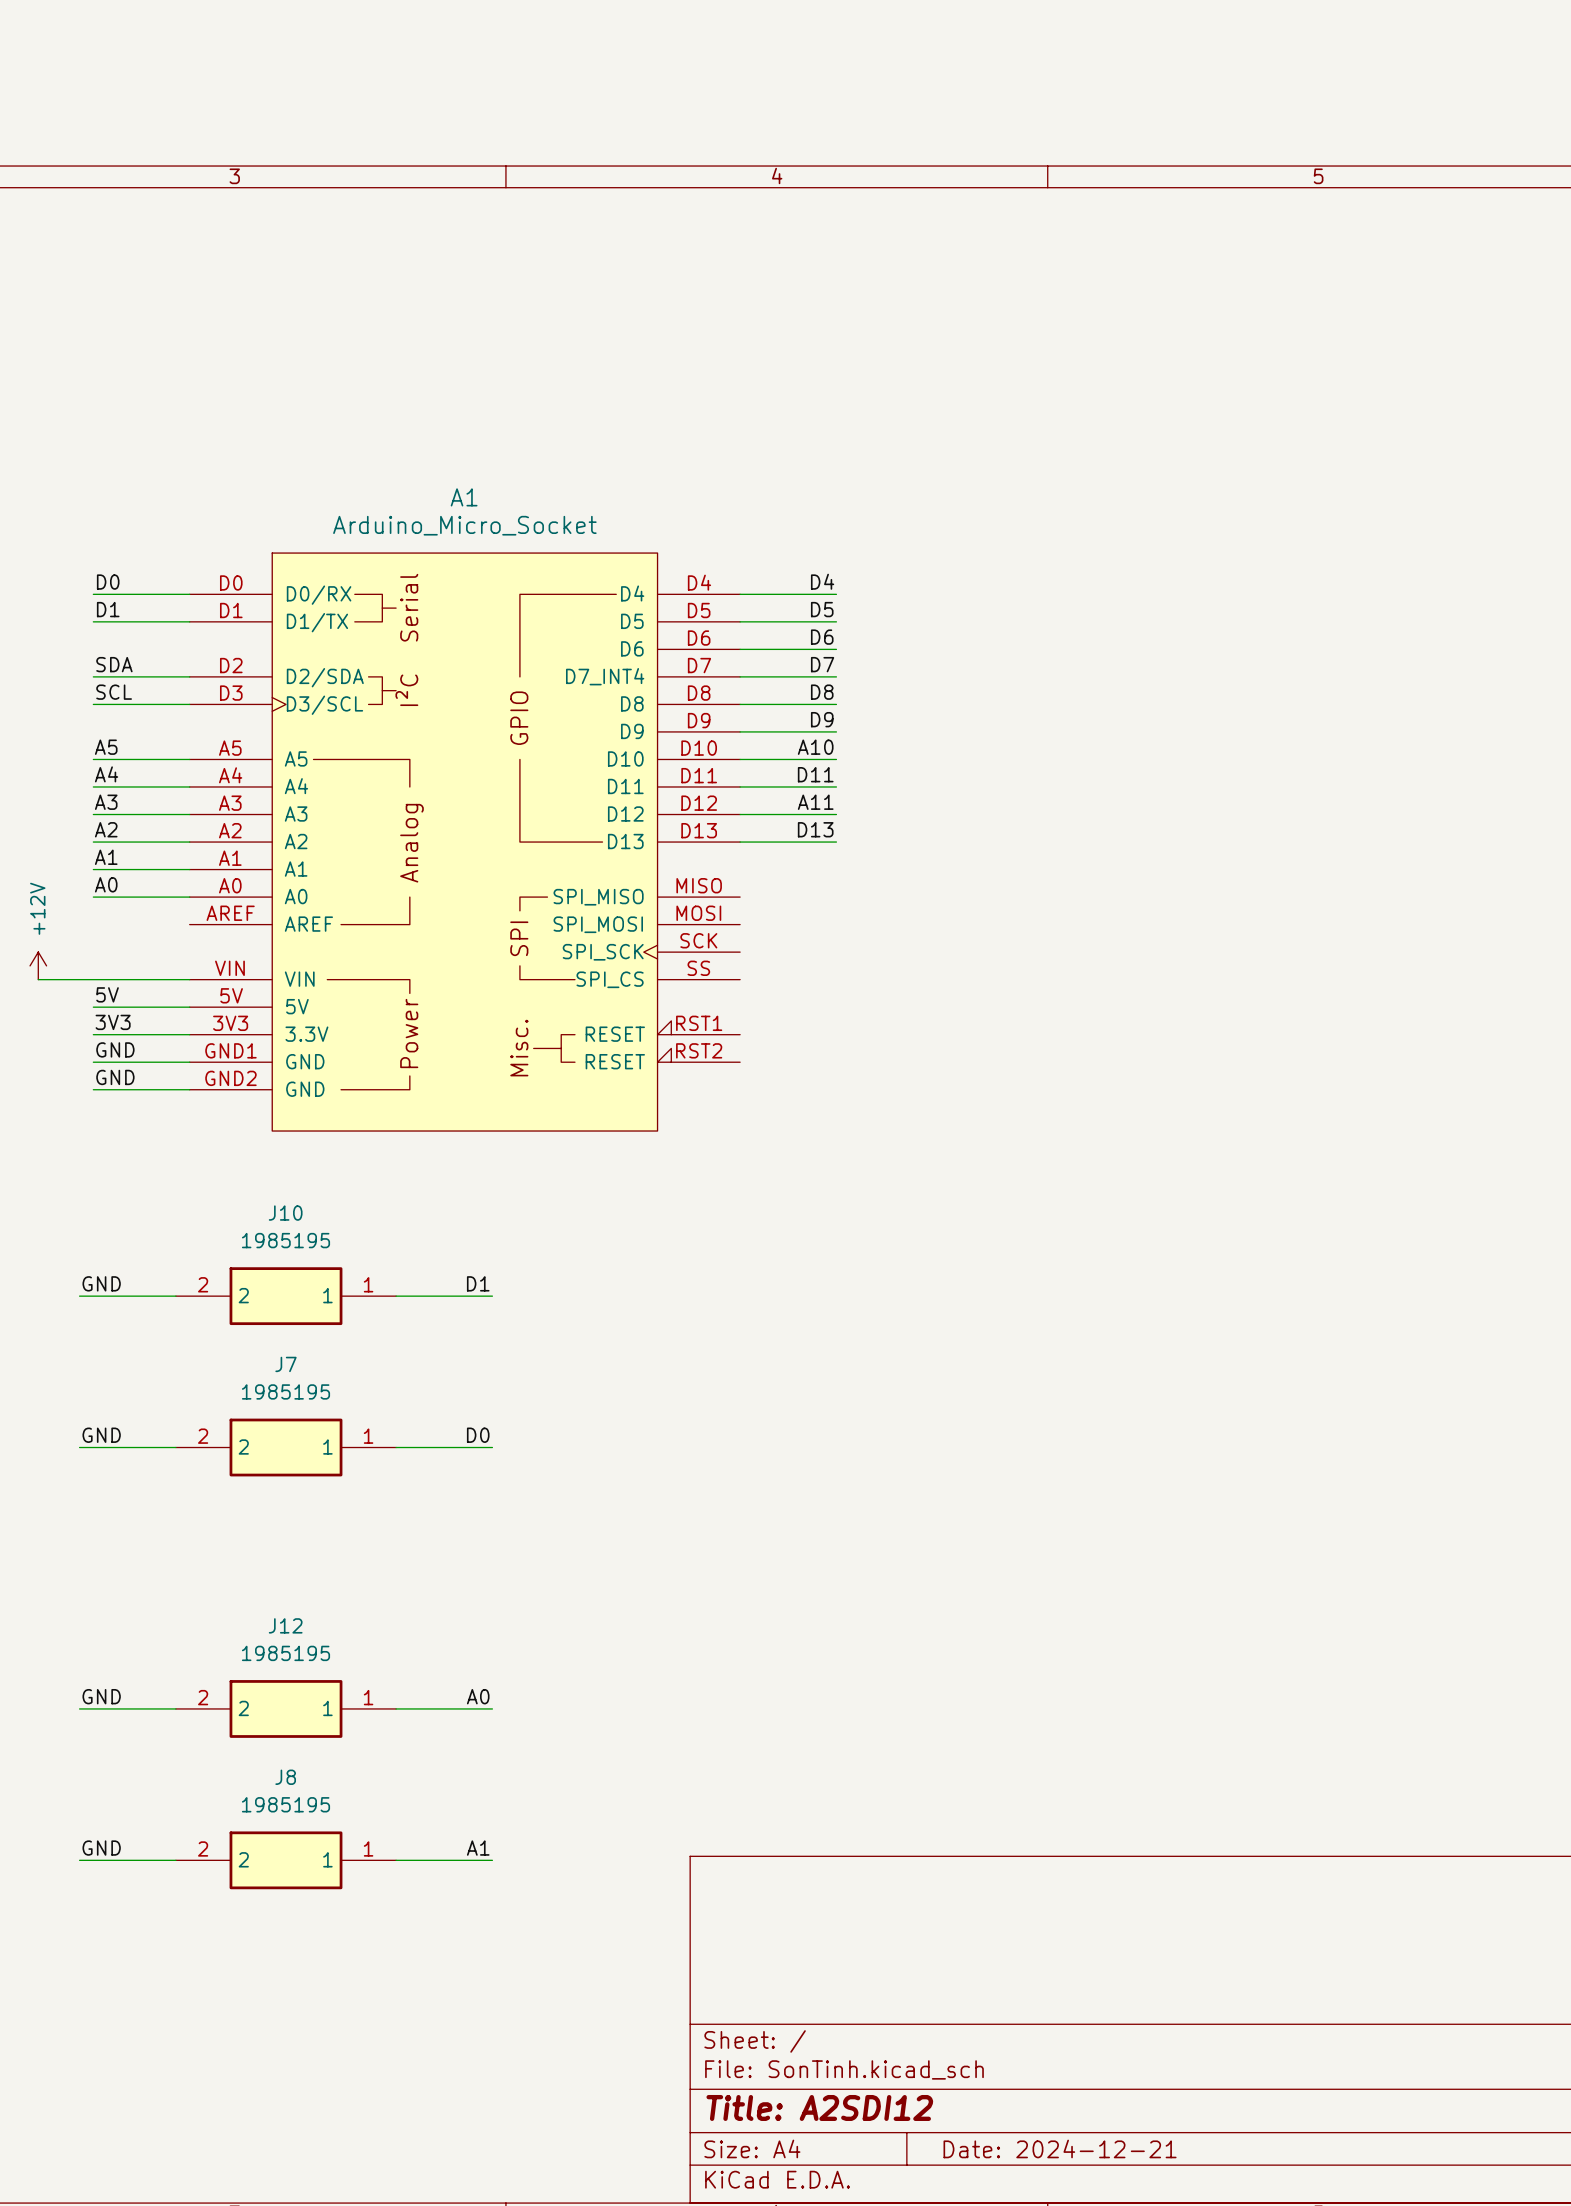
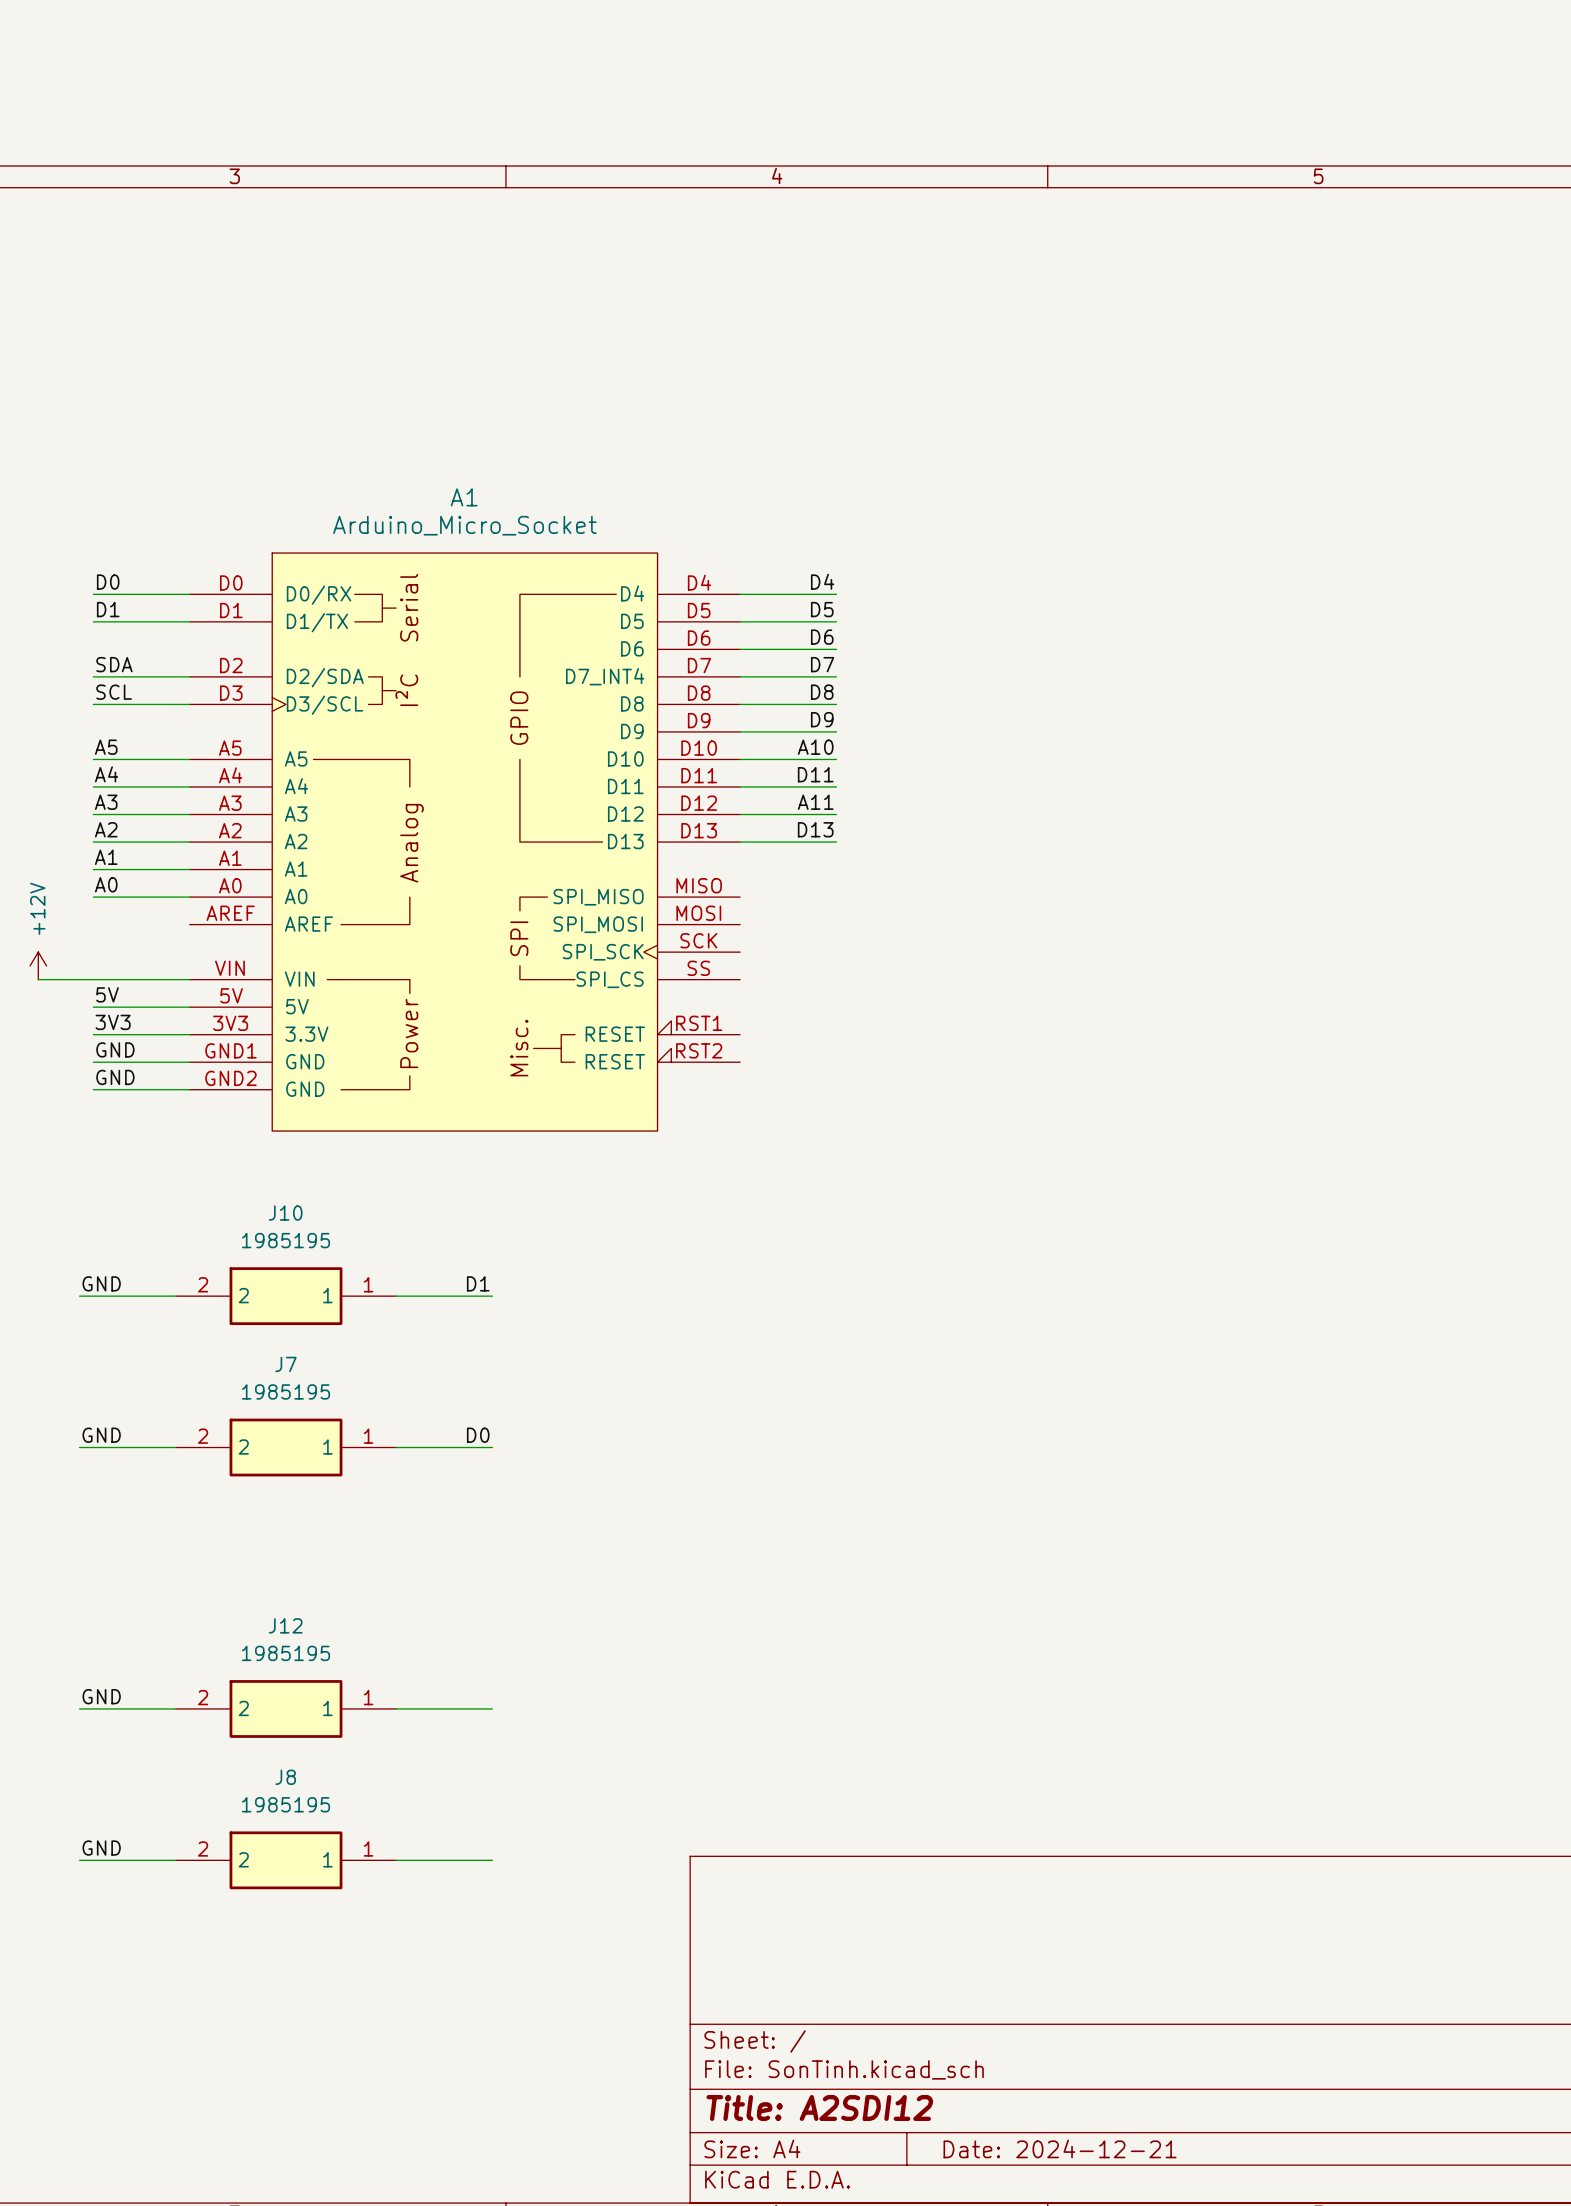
label: A0 (478, 1696) -> none
label: A1 (478, 1848) -> none

